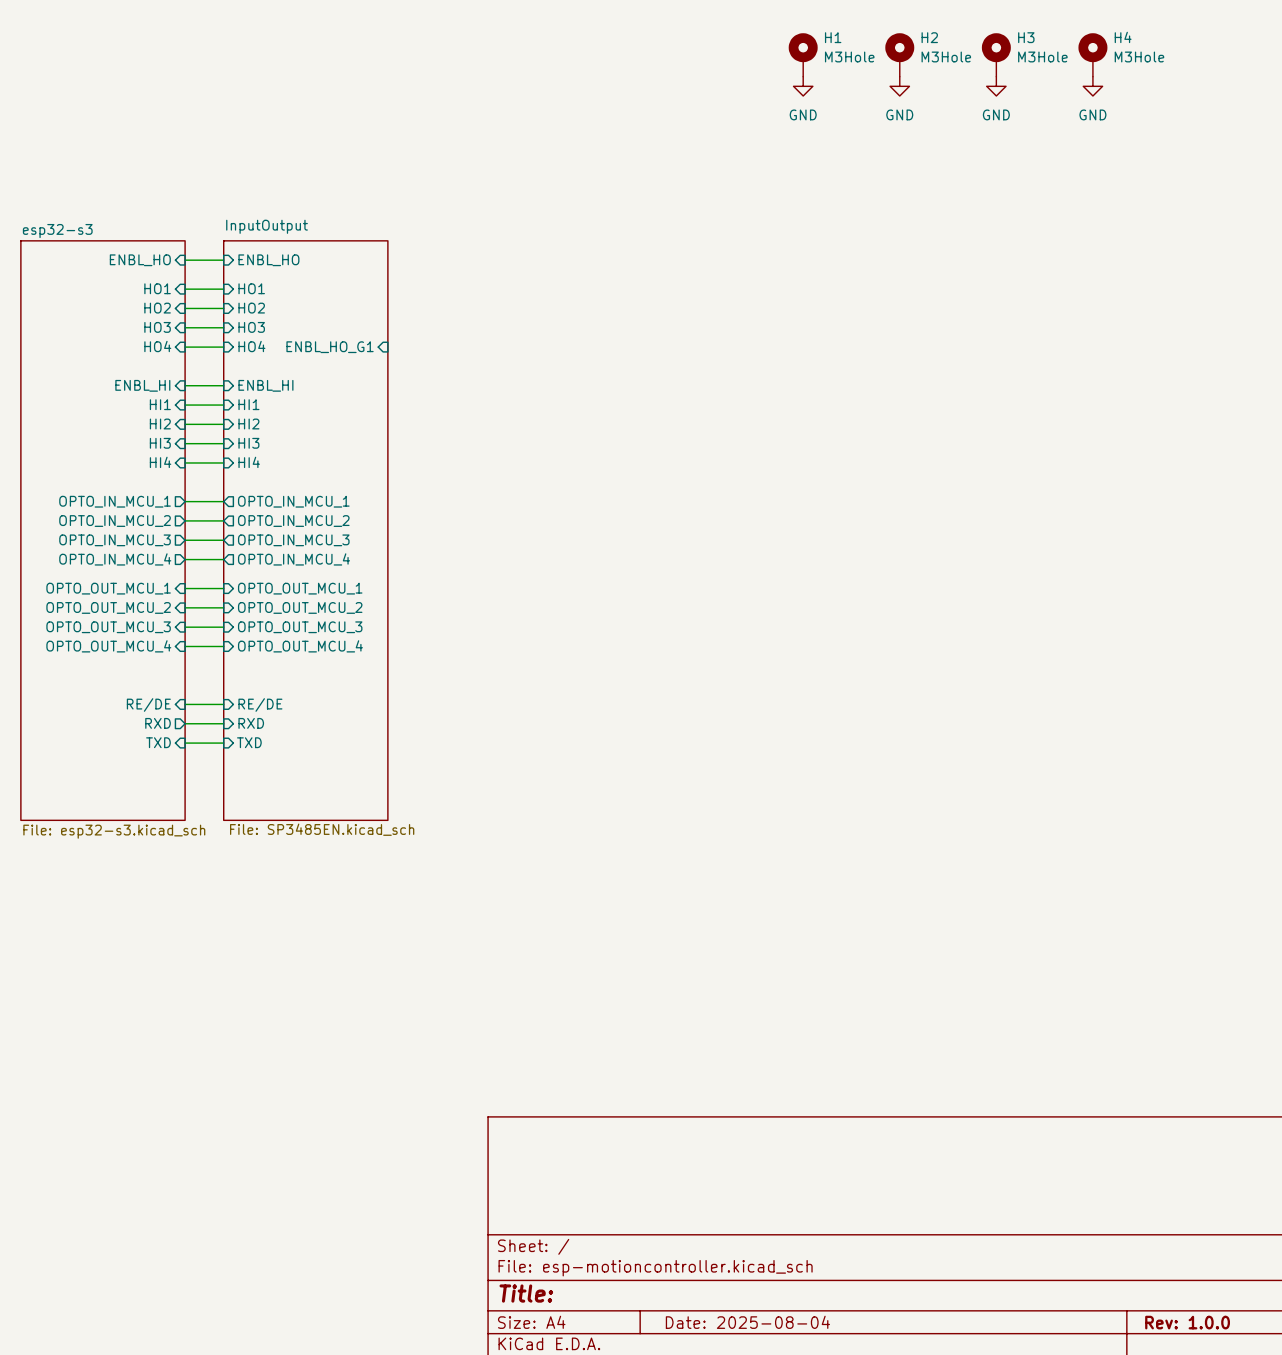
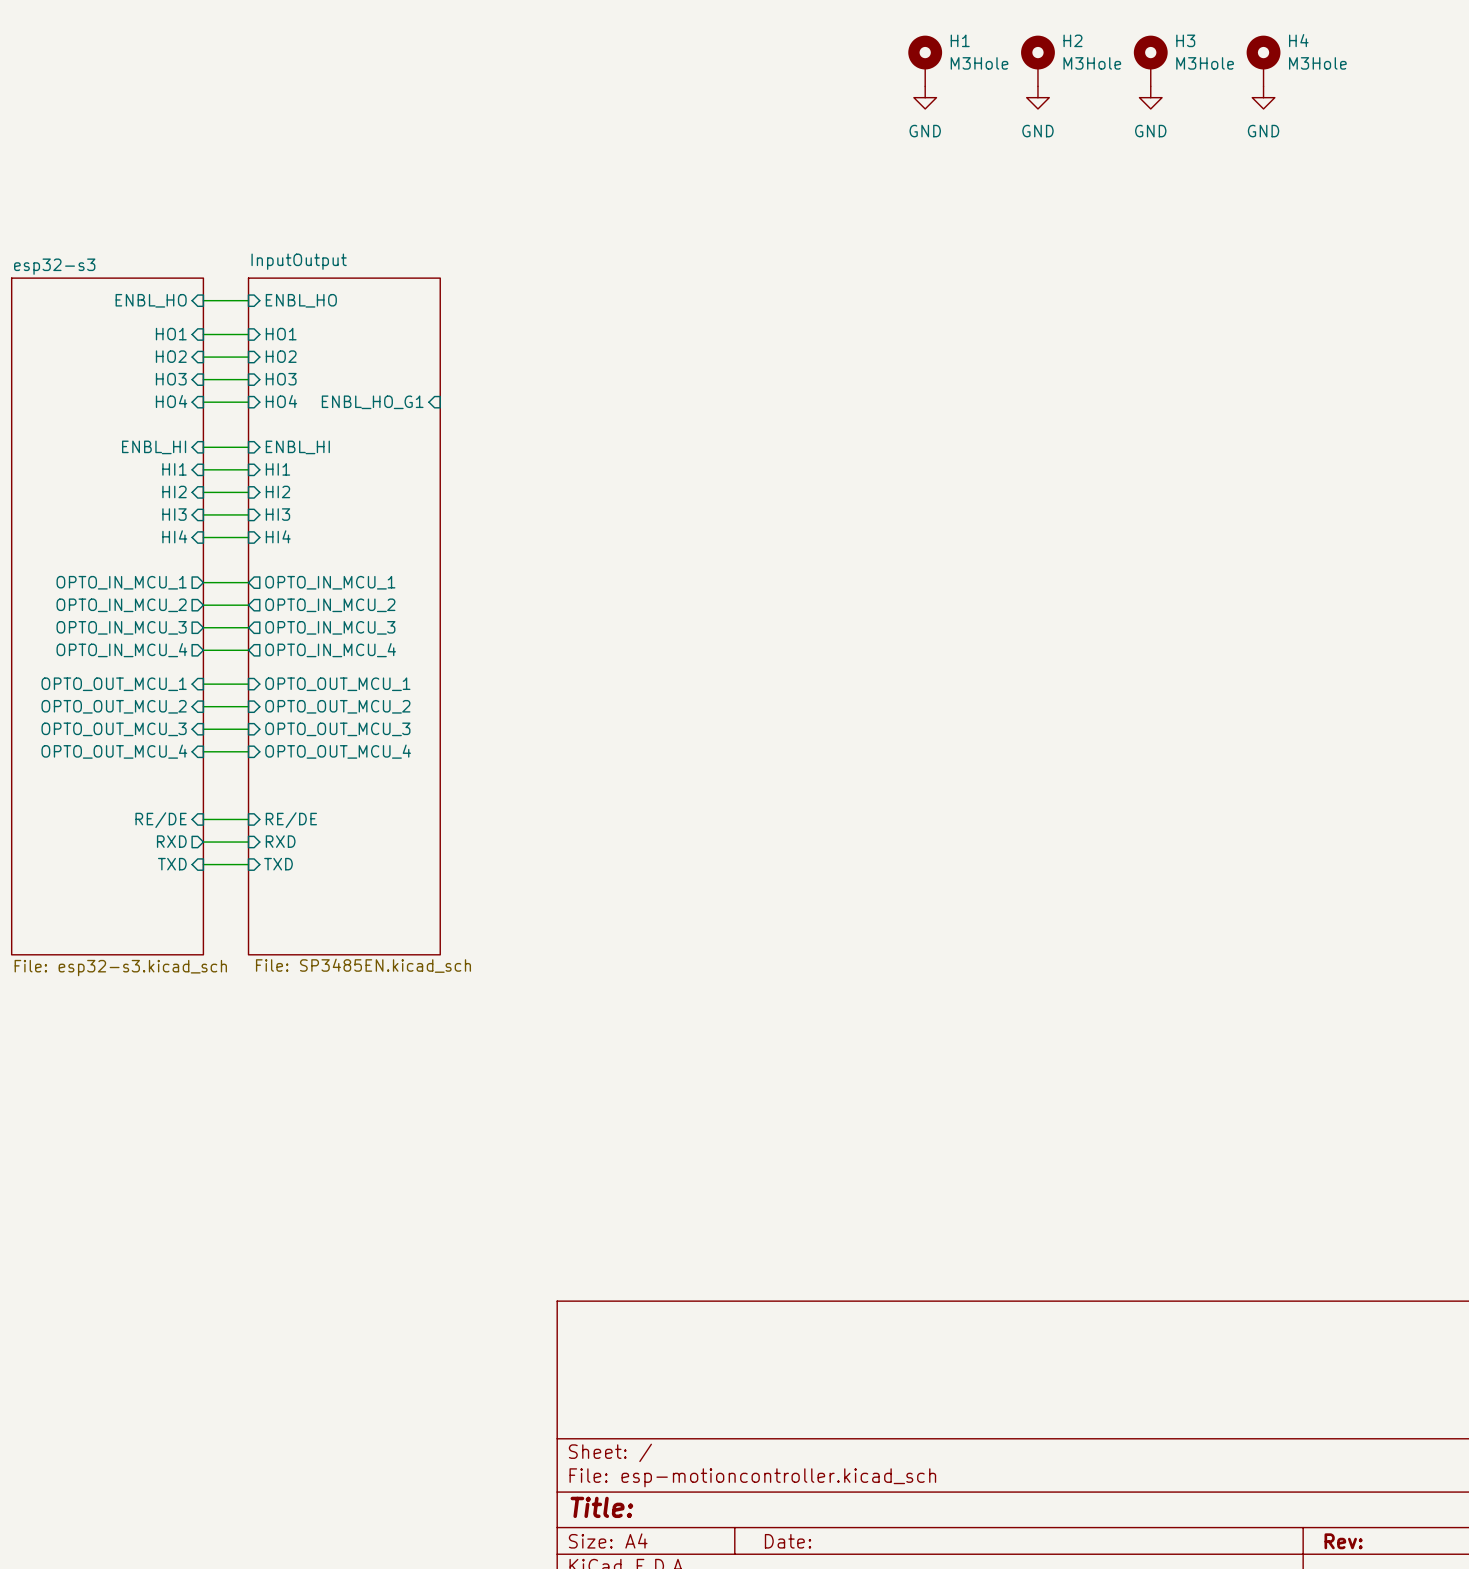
title block: Date: 2025-08-04 (747, 1322) -> Date: (788, 1541)
title block: Rev: 1.0.0 (1187, 1322) -> Rev: (1343, 1541)

